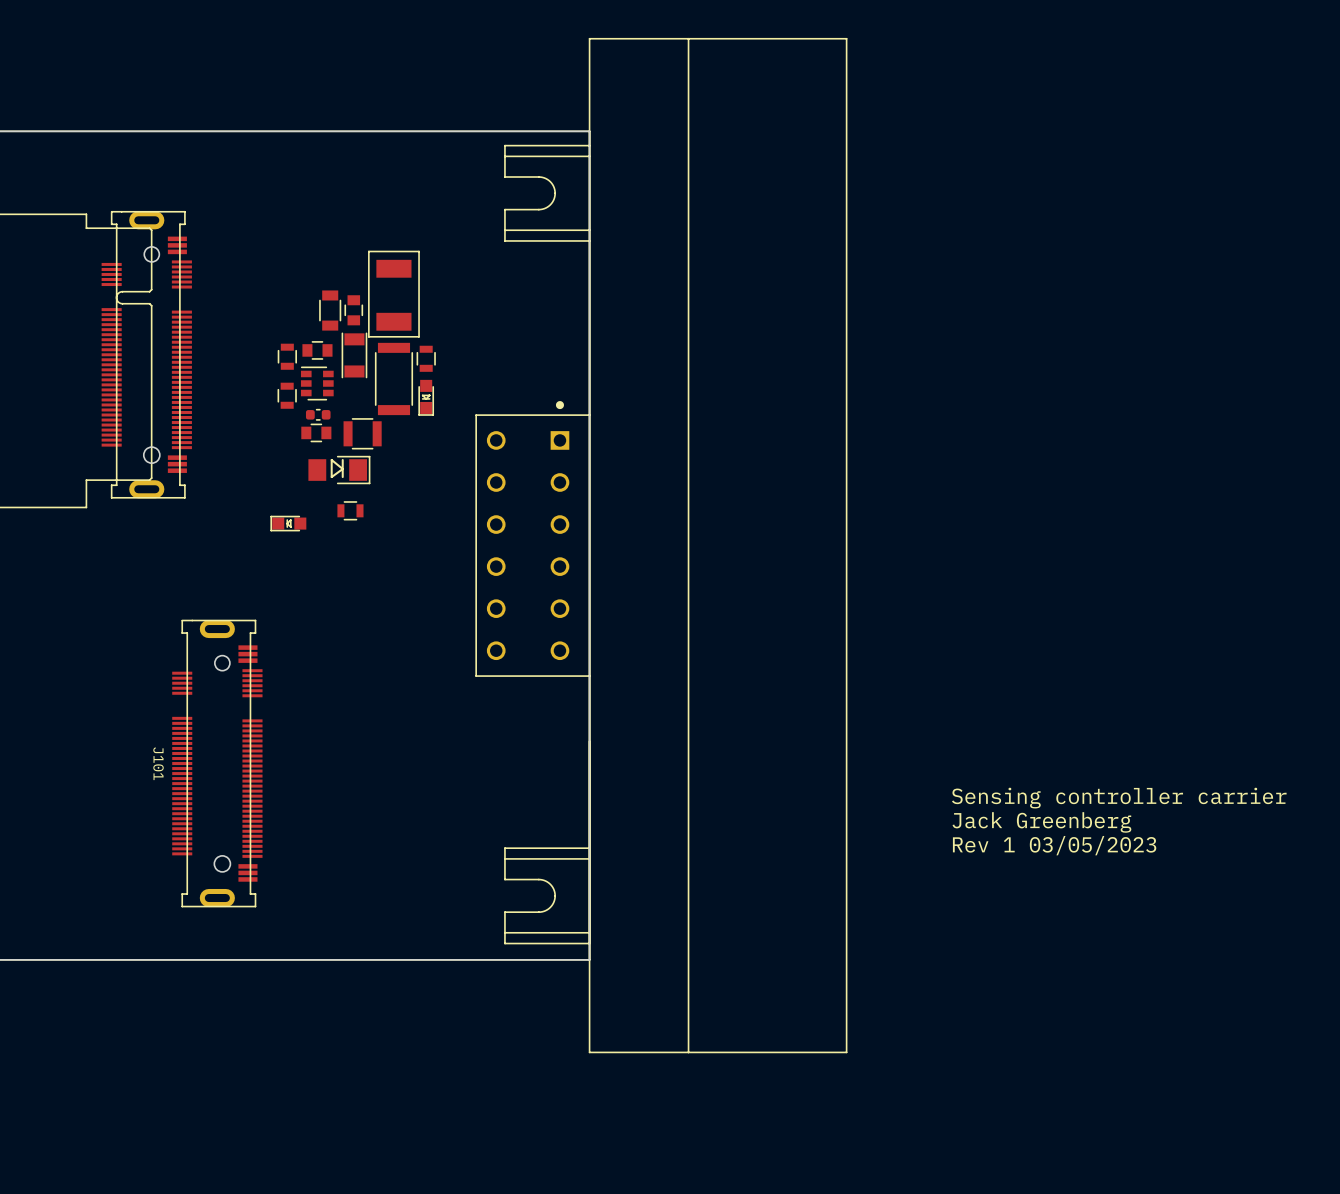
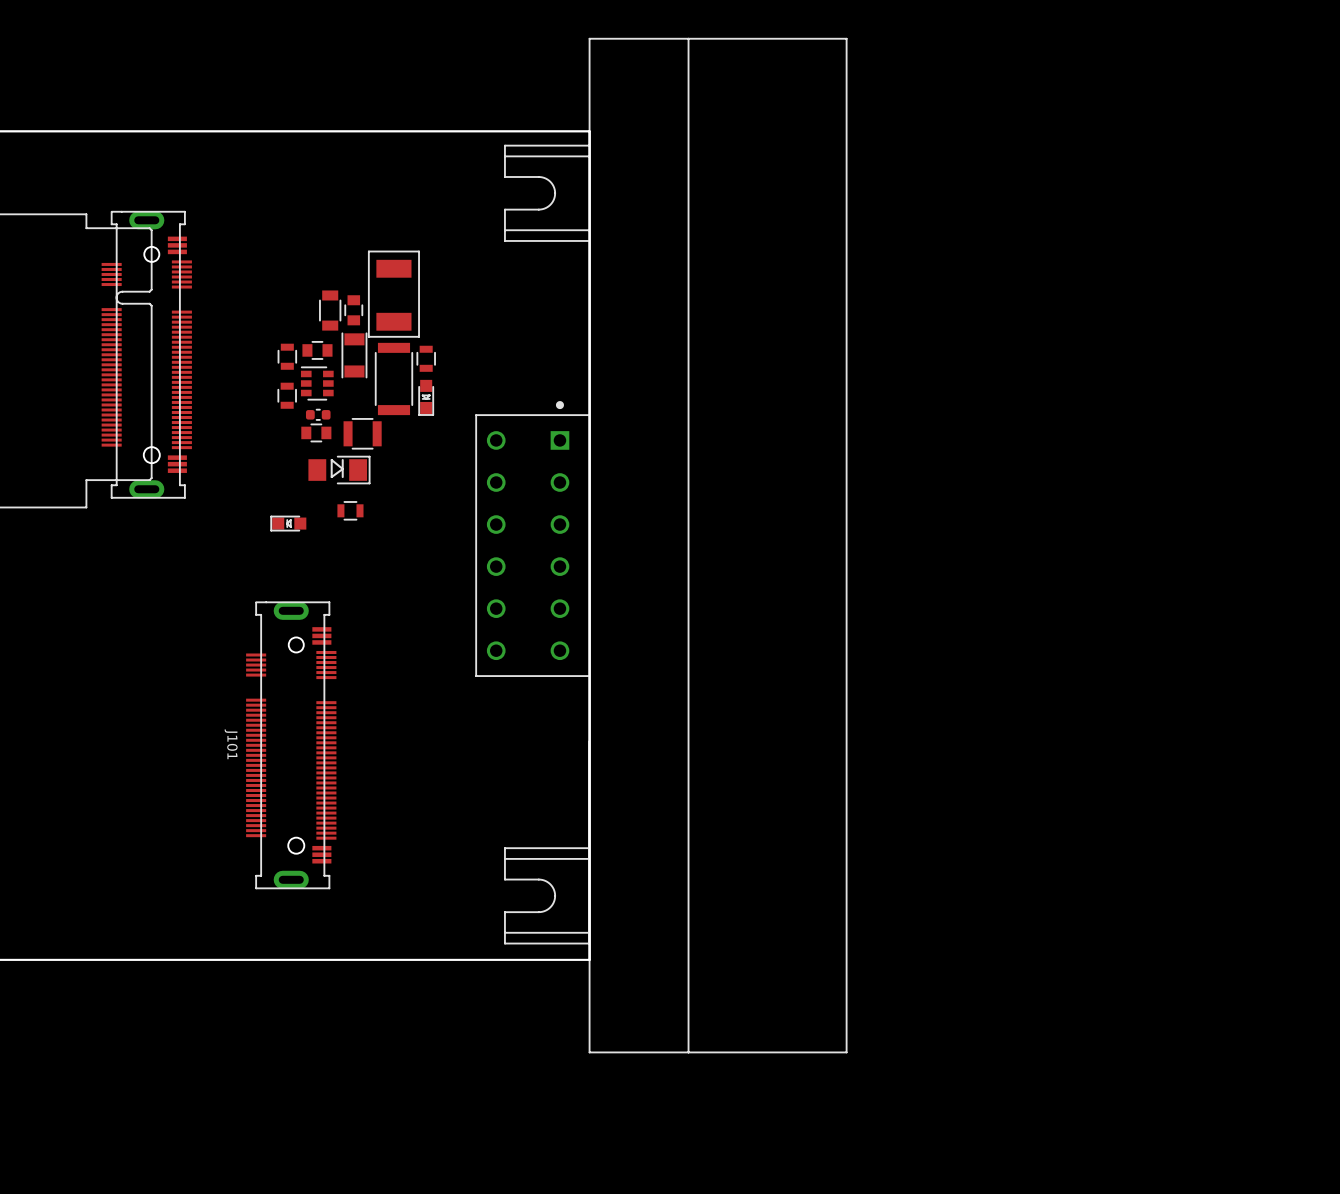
J101 position: (217, 763) -> (291, 745)
text: Sensing controller carrier (1119, 798) -> none
text: Jack Greenberg (1041, 822) -> none
text: Rev 1 03/05/2023 (1054, 845) -> none

